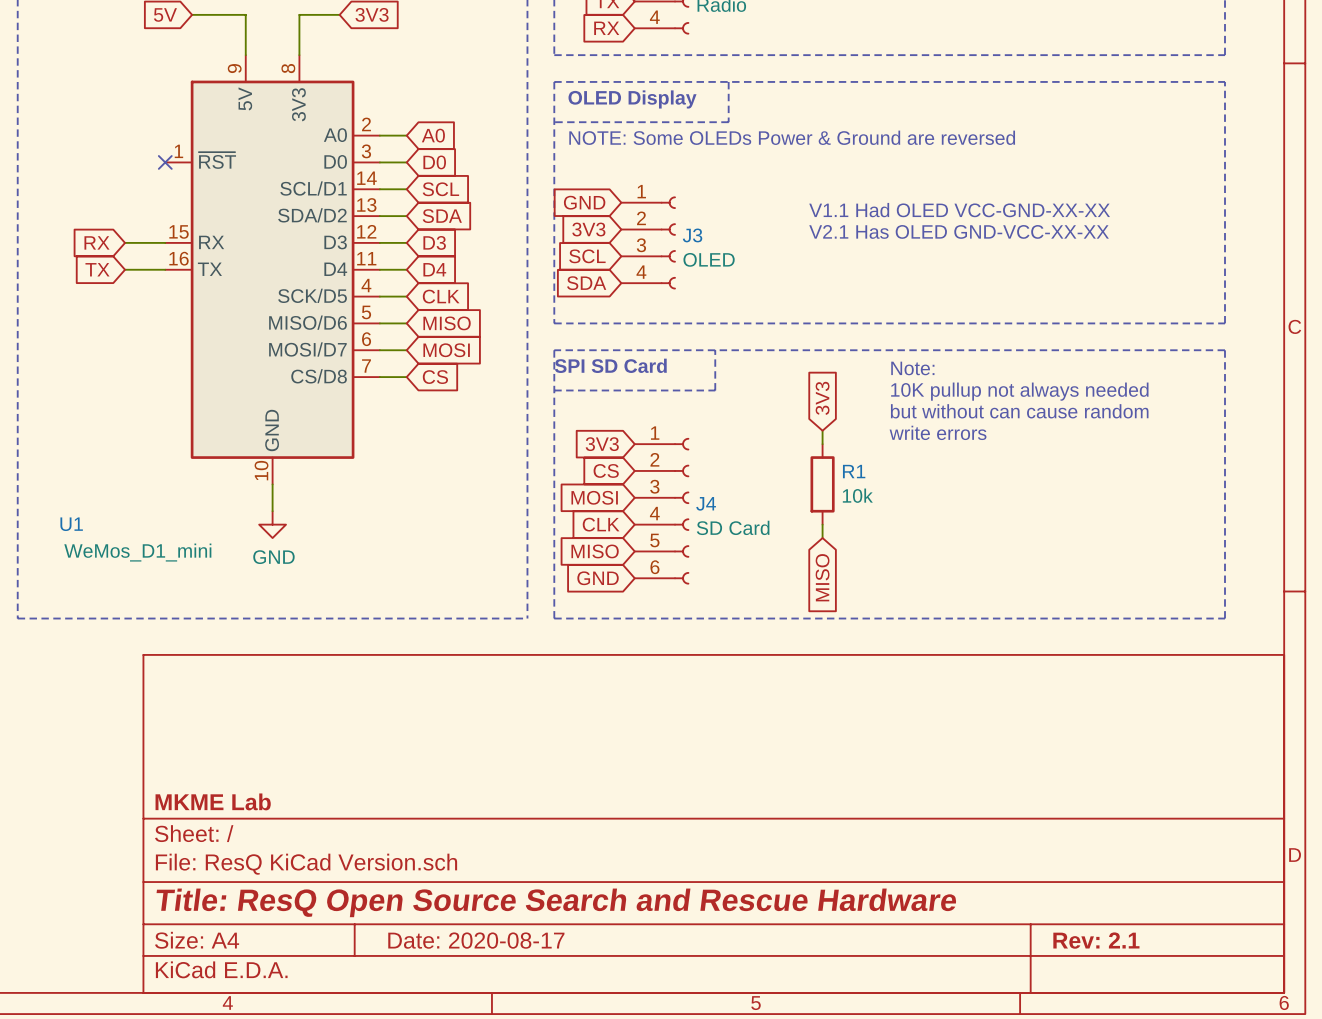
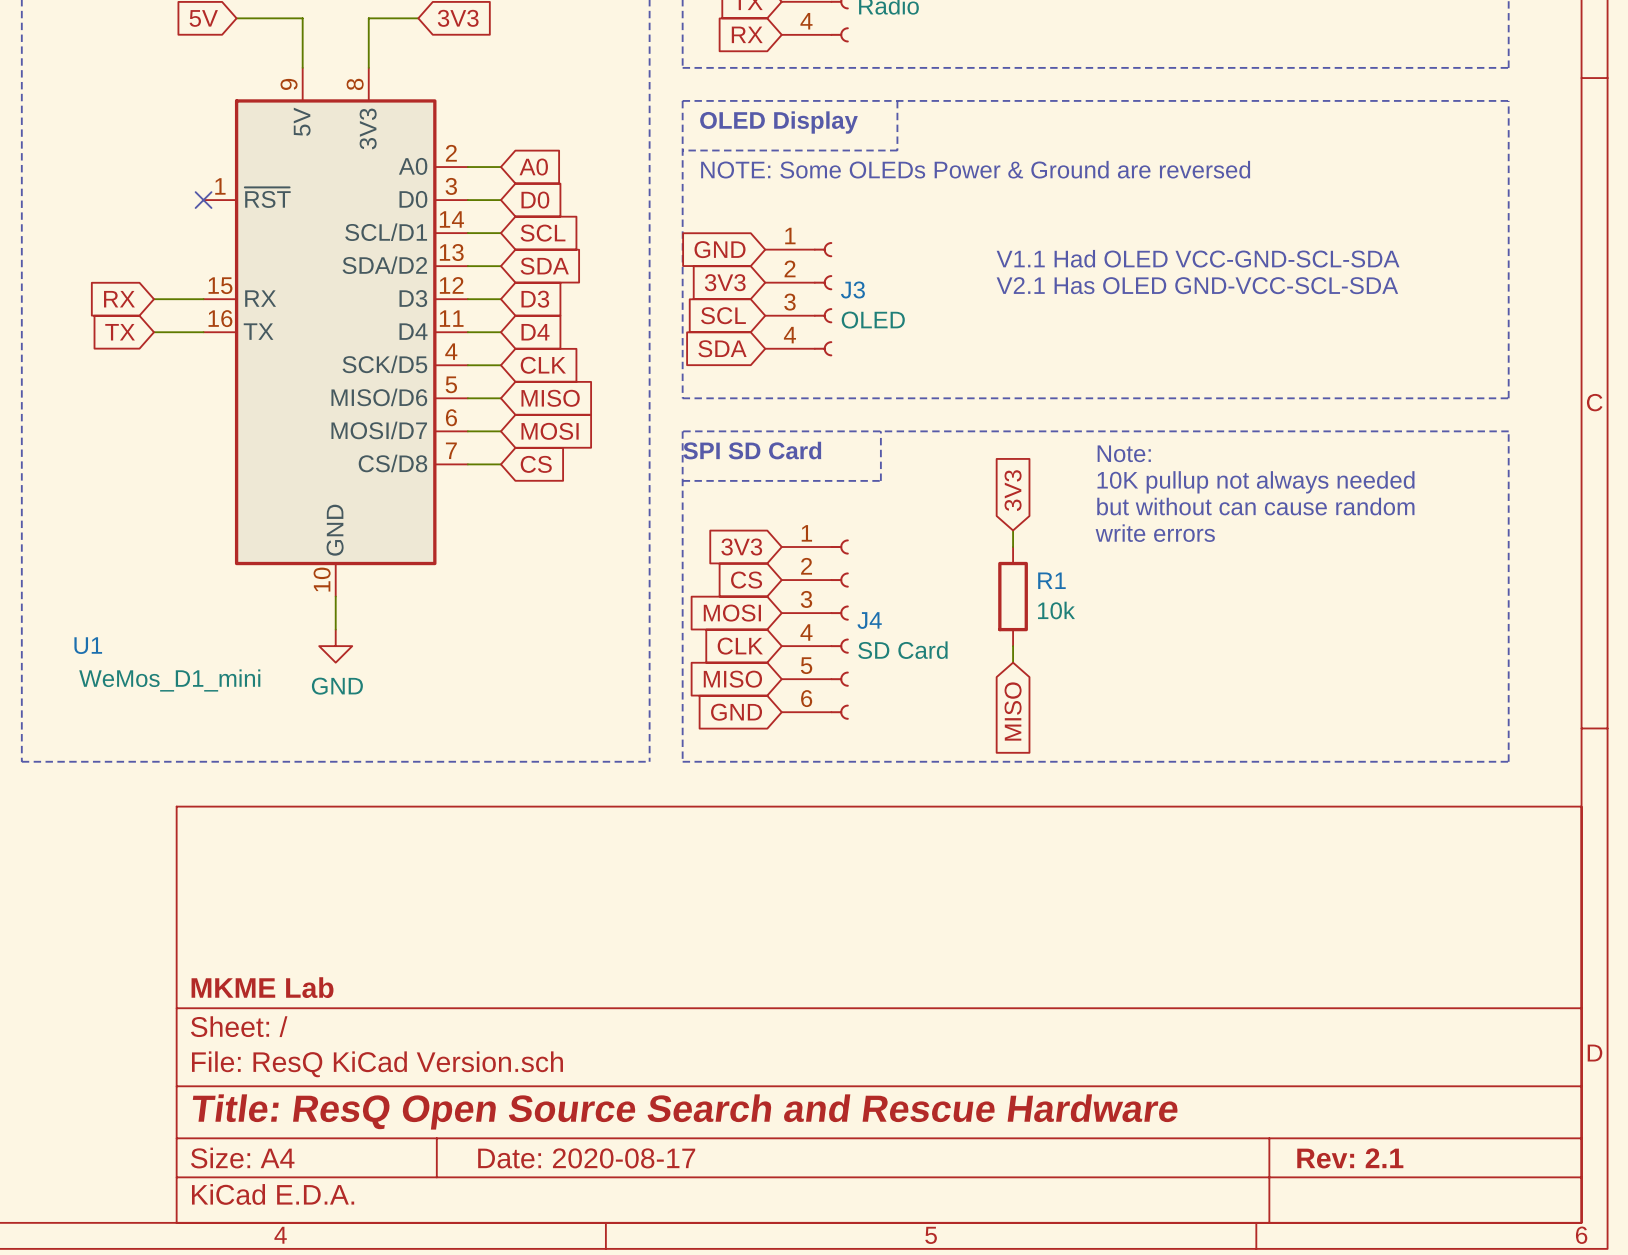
text: V1.1 Had OLED VCC-GND-XX-XX (959, 210) -> V1.1 Had OLED VCC-GND-SCL-SDA (1198, 258)
text: V2.1 Has OLED GND-VCC-XX-XX (959, 231) -> V2.1 Has OLED GND-VCC-SCL-SDA (1197, 285)

